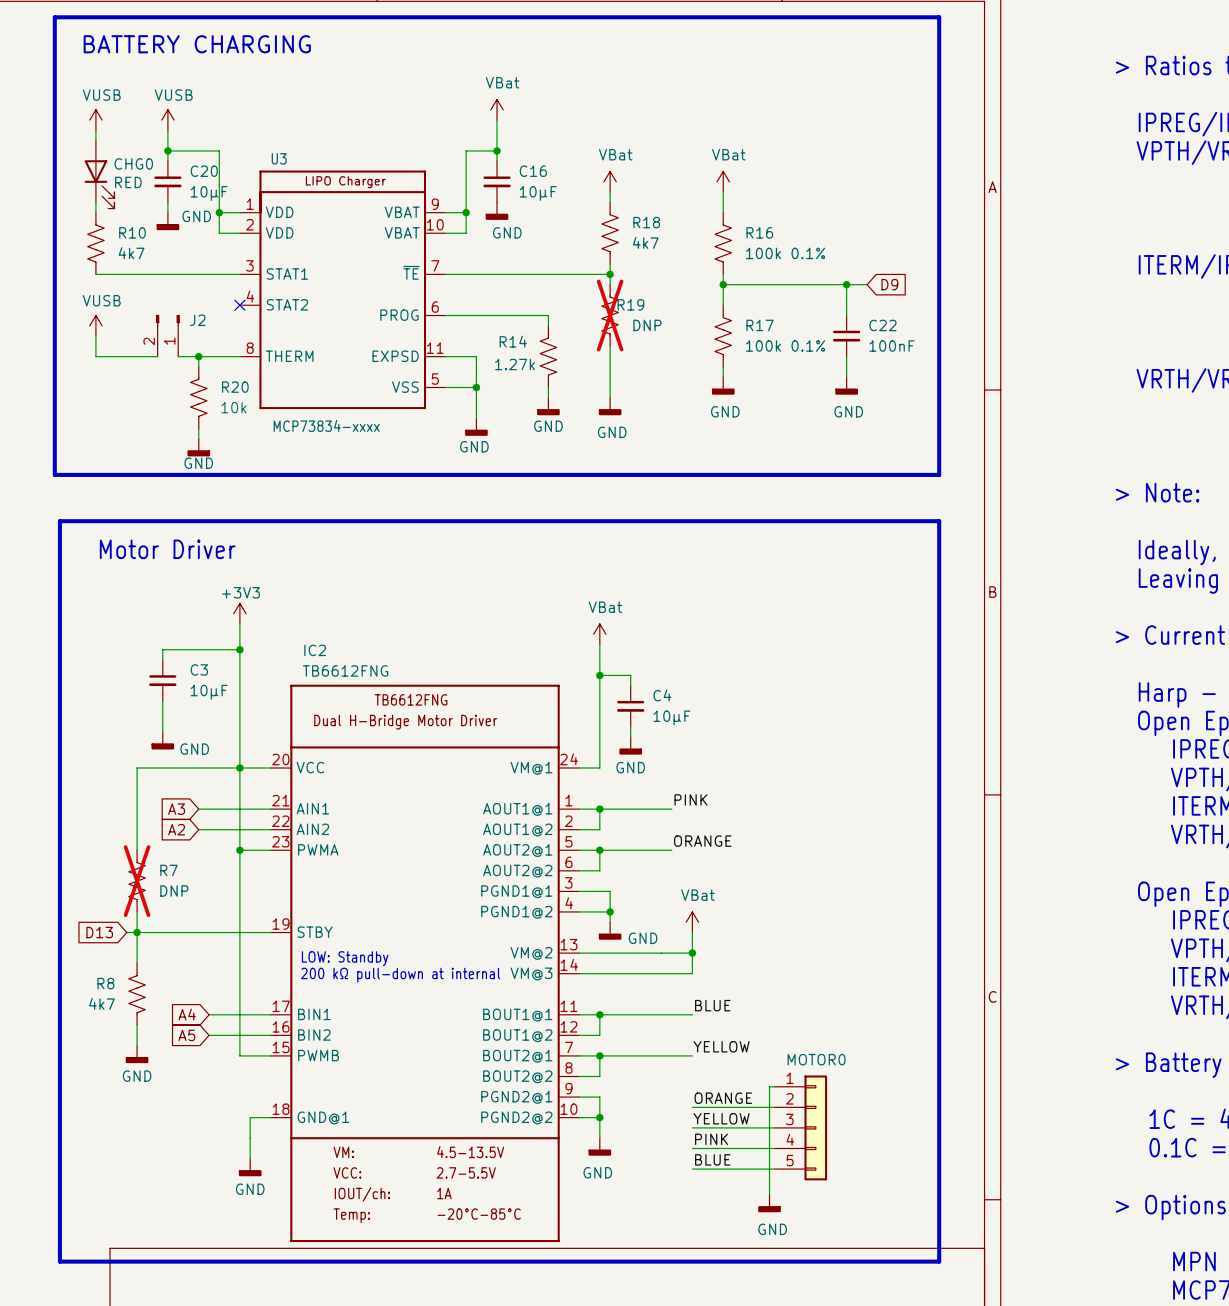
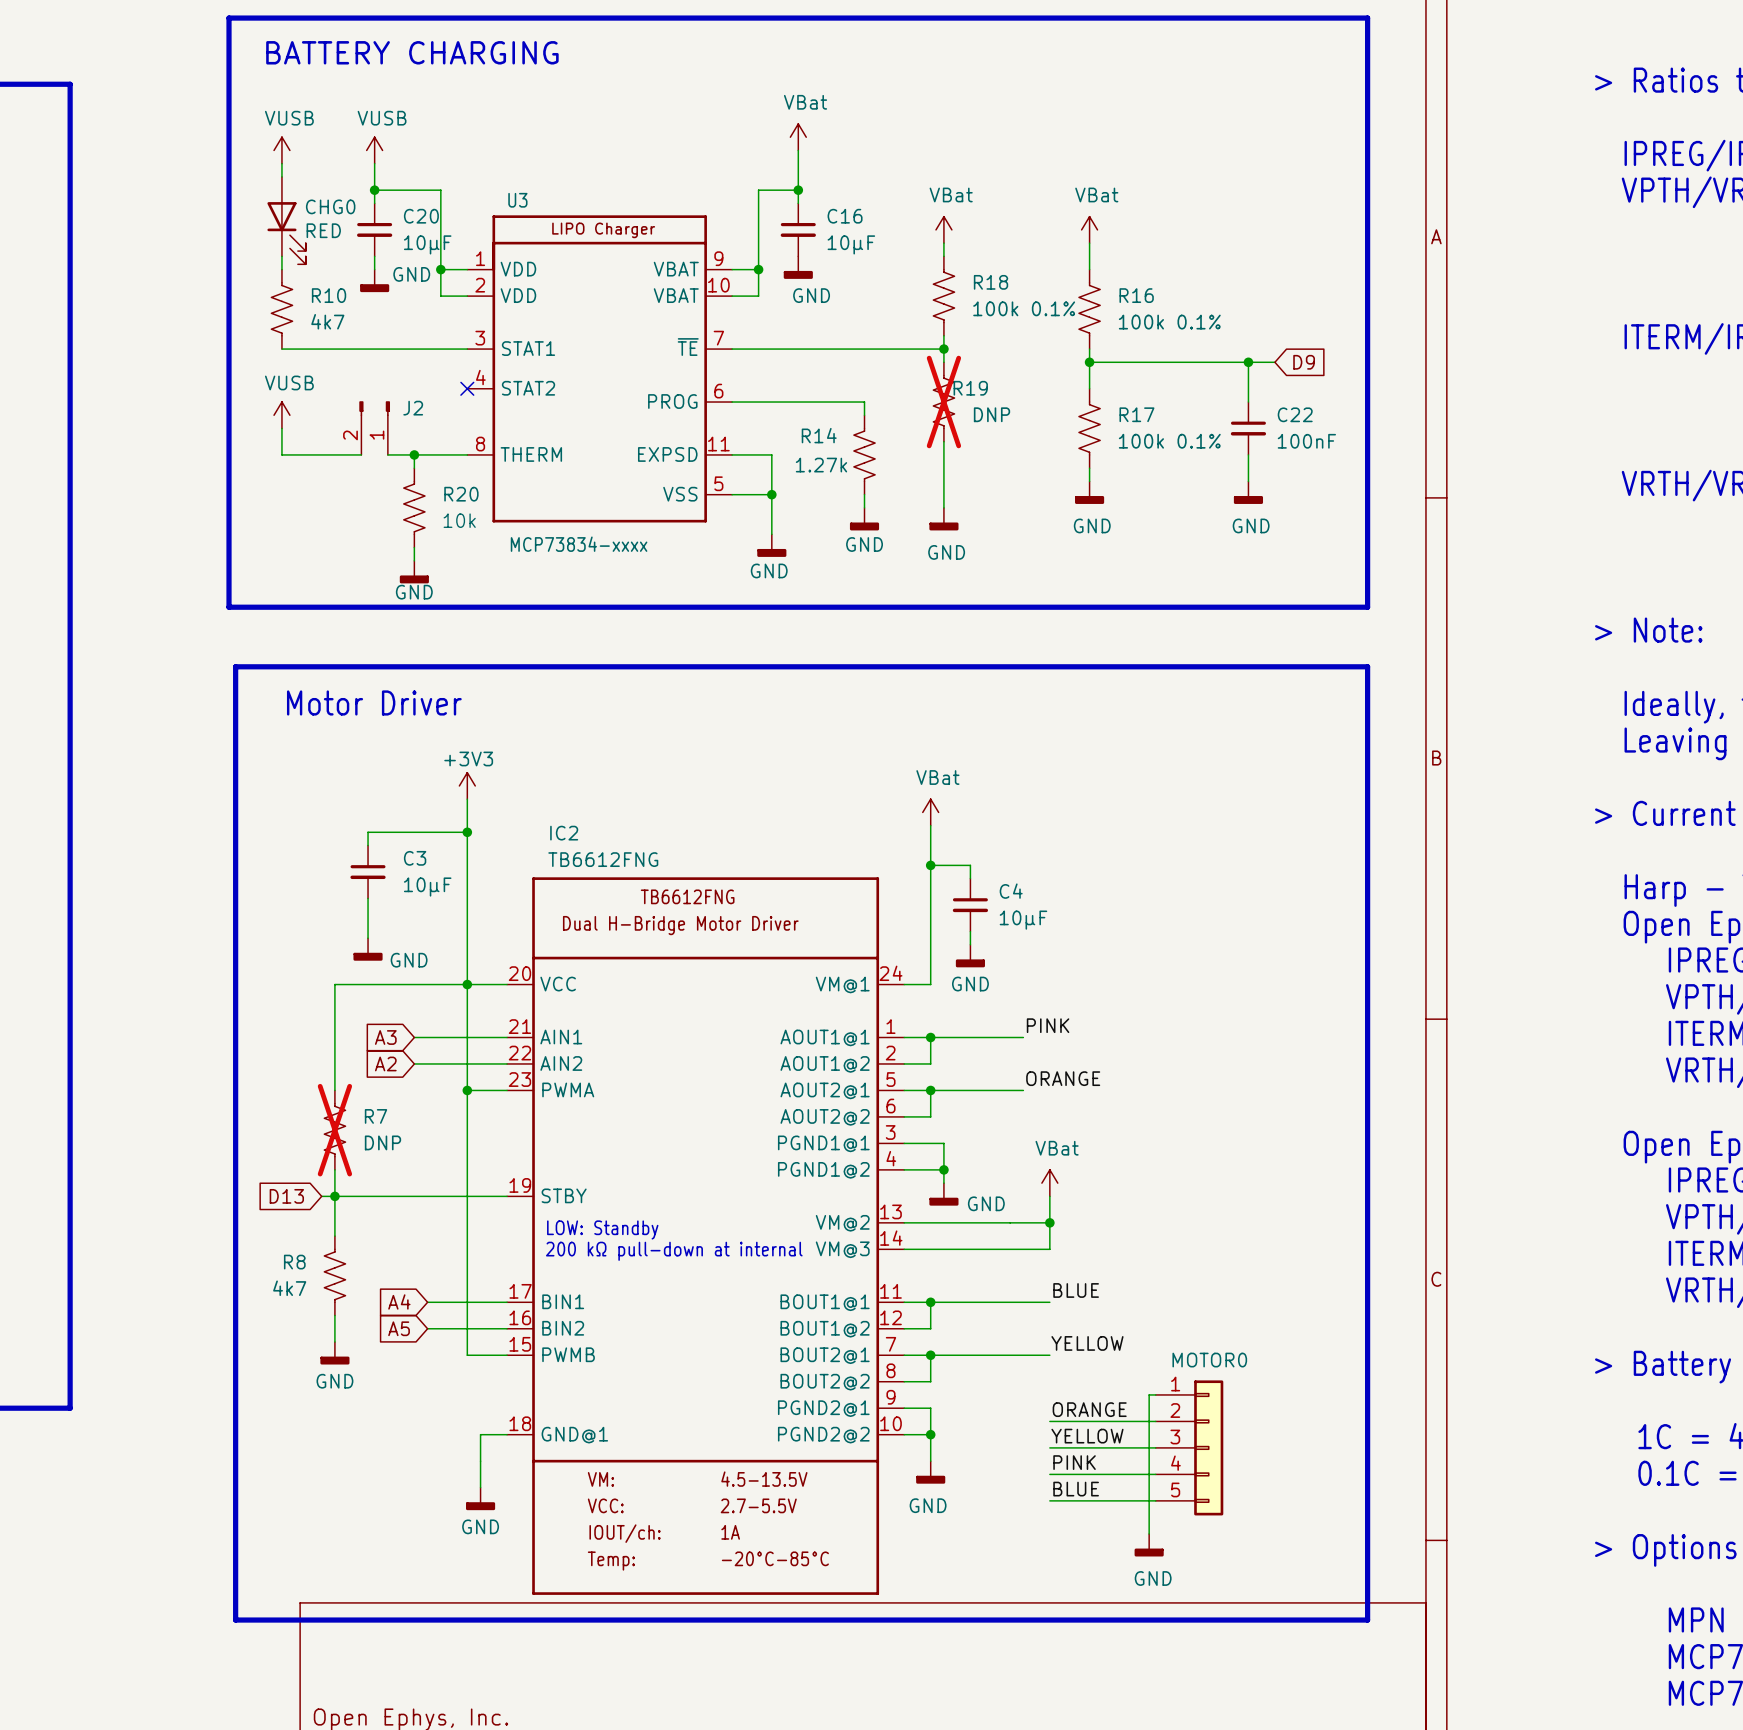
R18 value: 4k7 (645, 242) -> 100k 0.1% (1024, 308)

